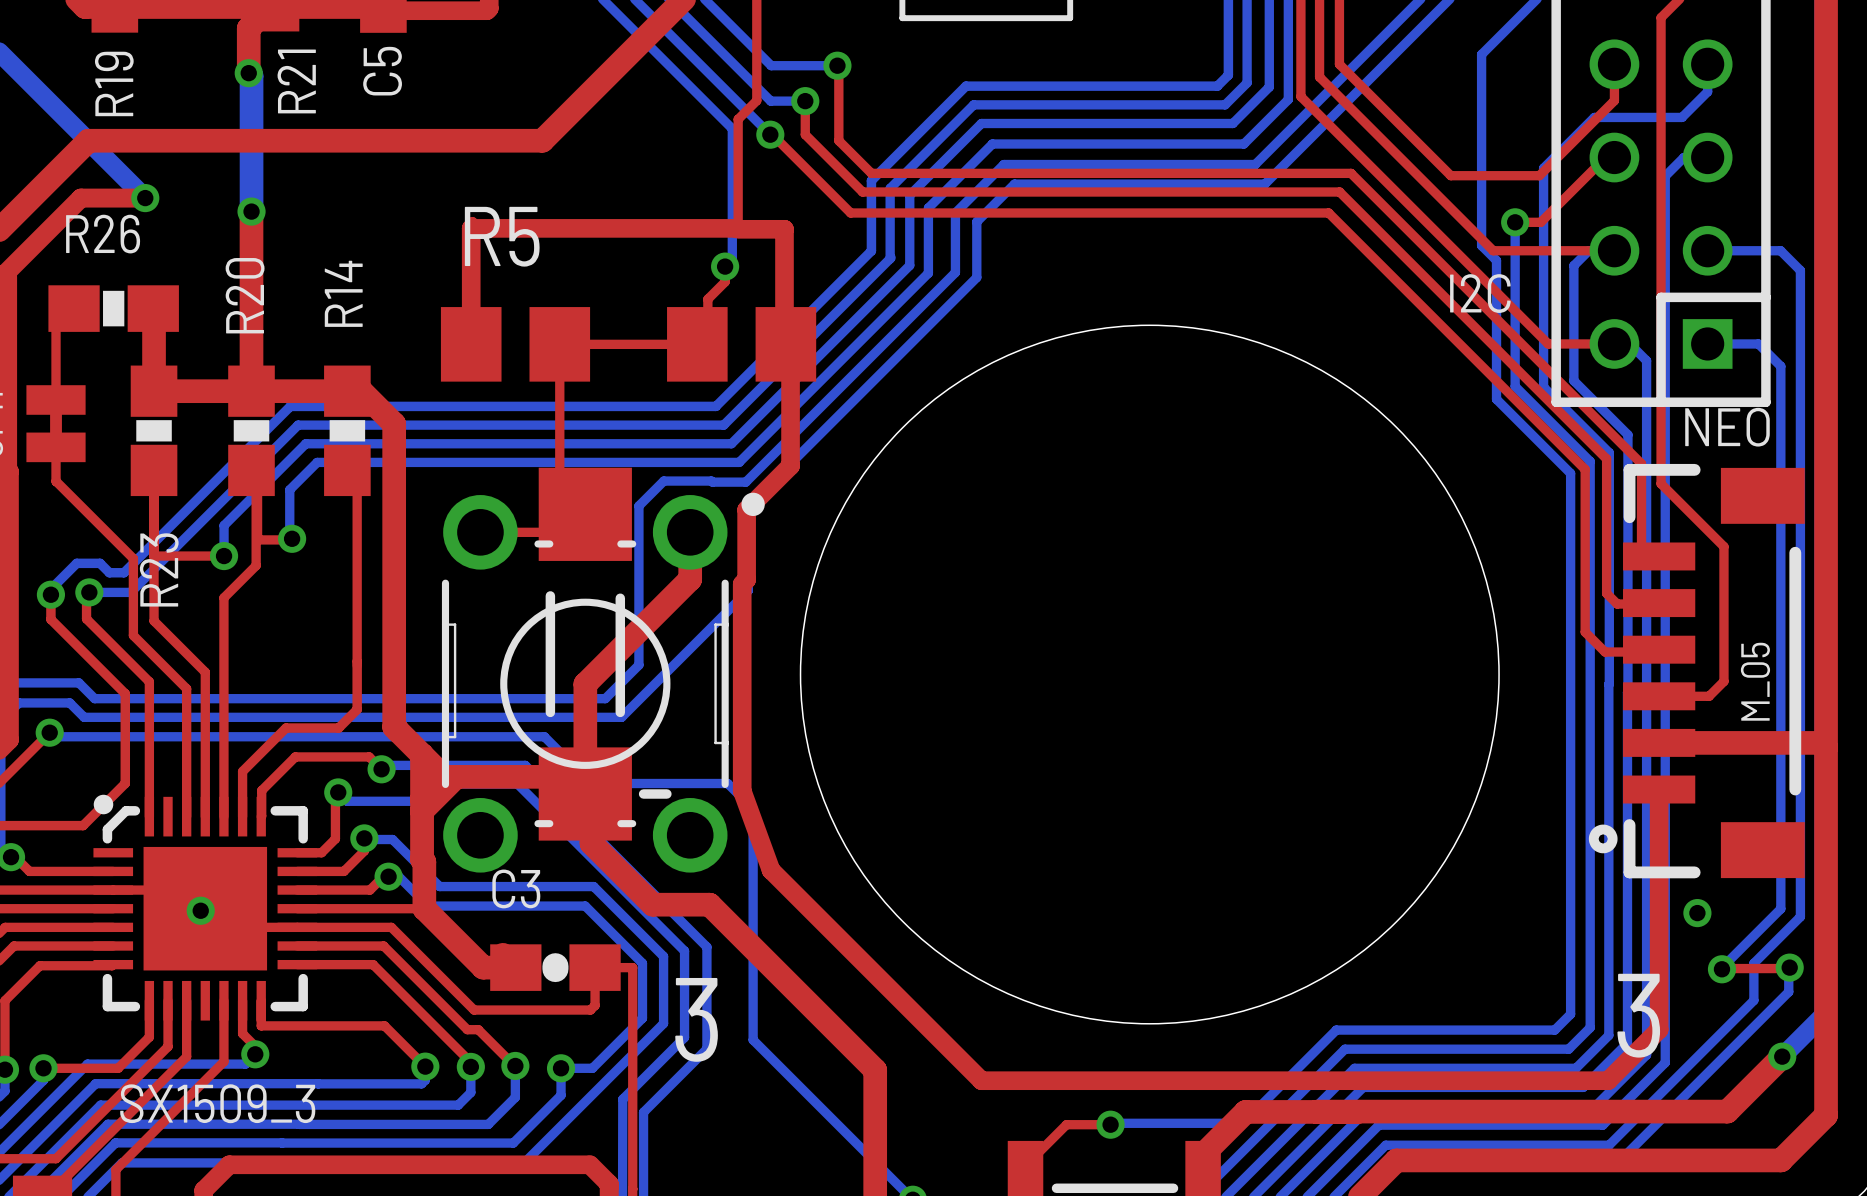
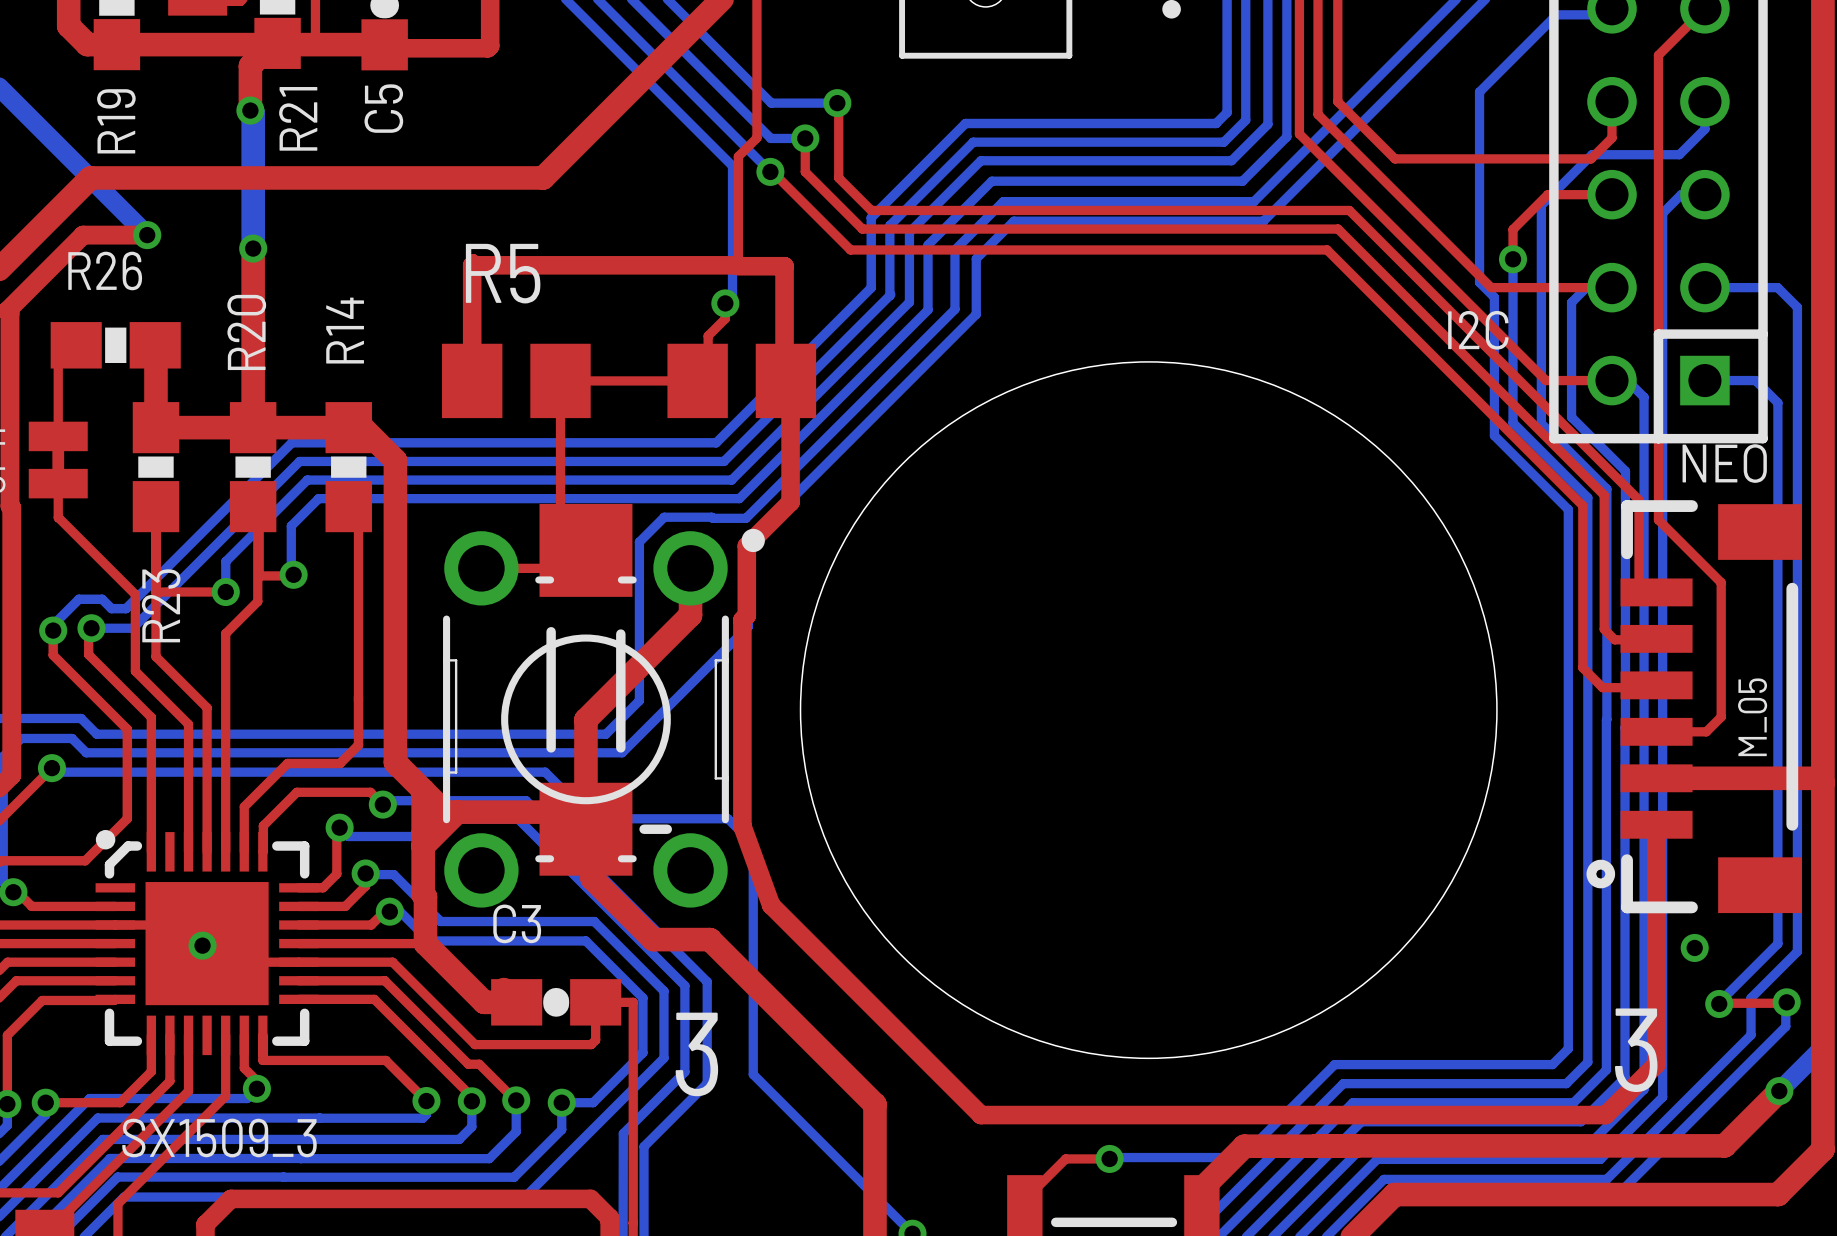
top track: (1396, 121) (1450, 175) (1539, 175) (1593, 121) -> (1394, 158) (1591, 158)
top track: (1605, 157) (1540, 222) (1515, 222) -> (1603, 194) (1547, 194) (1513, 229) (1513, 259)

